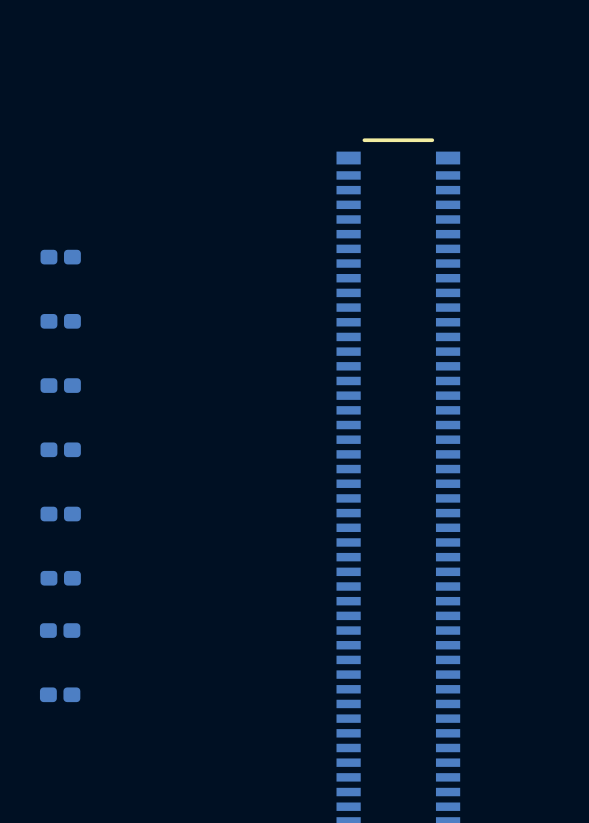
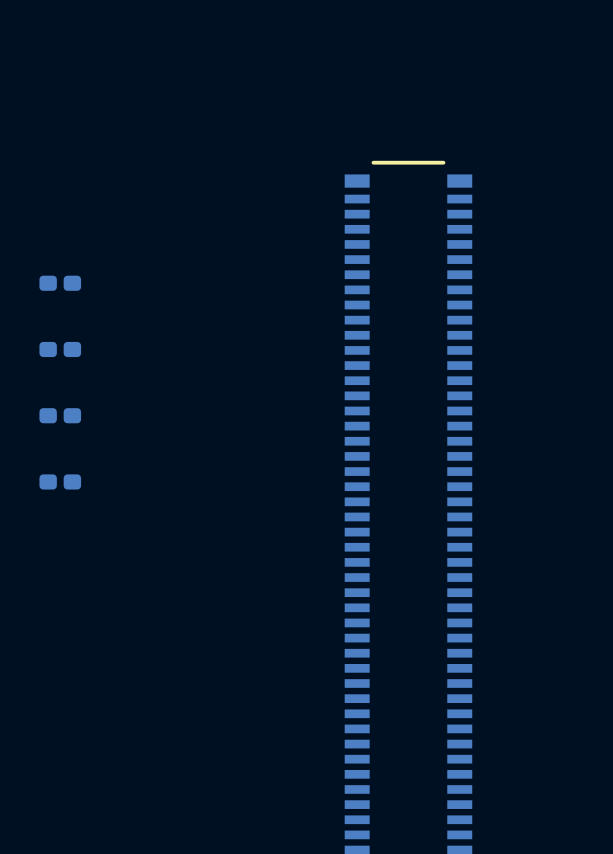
part: (60, 514) -> none
part: (60, 578) -> none
part: (60, 630) -> none
part: (60, 694) -> none

